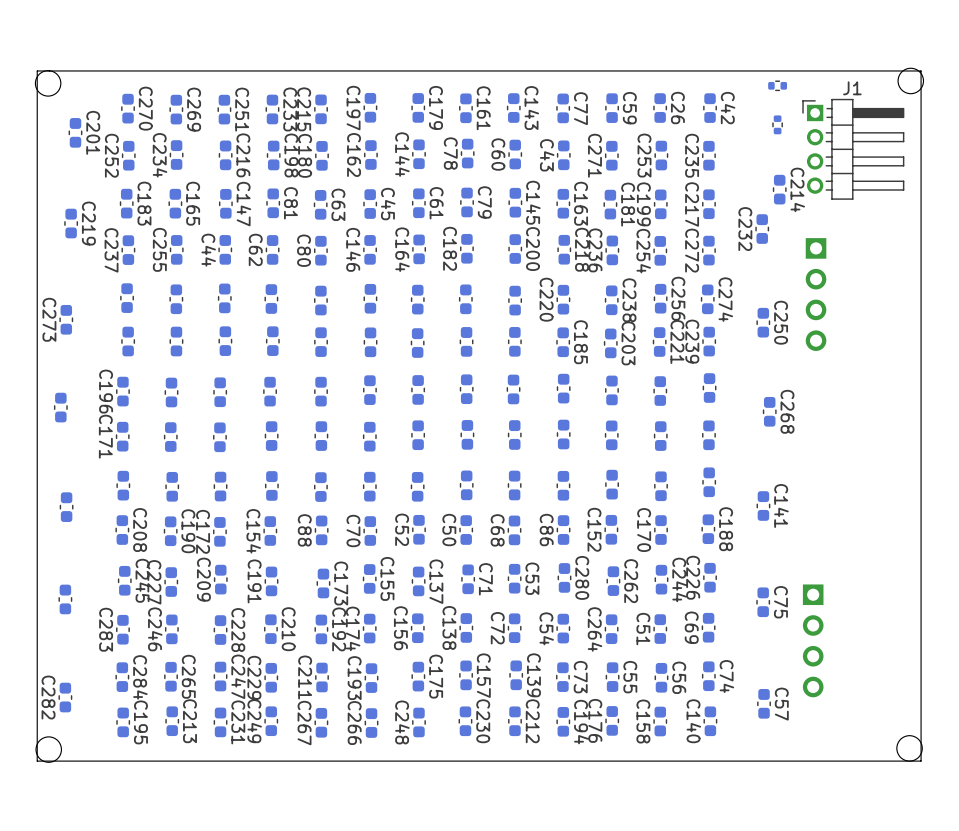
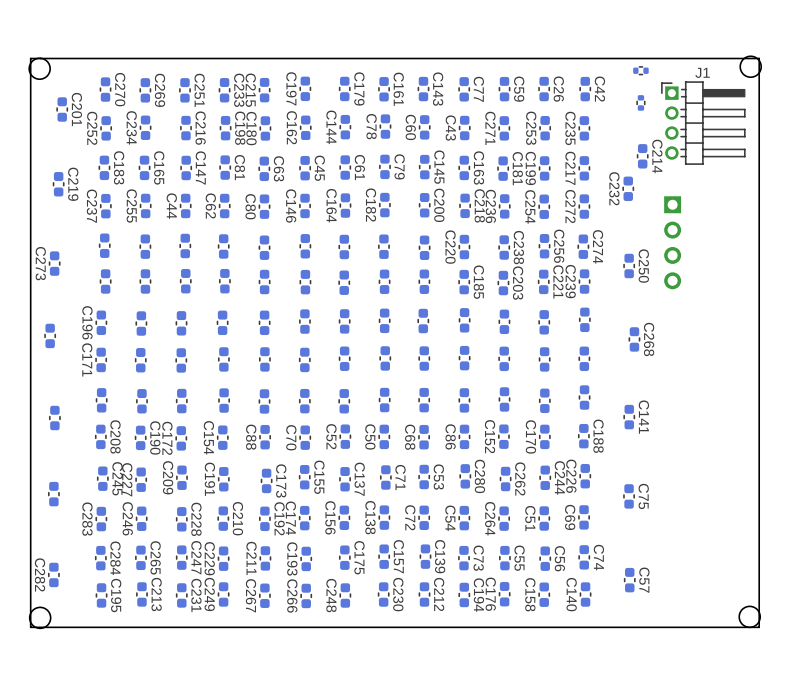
part: (813, 640) -> none

